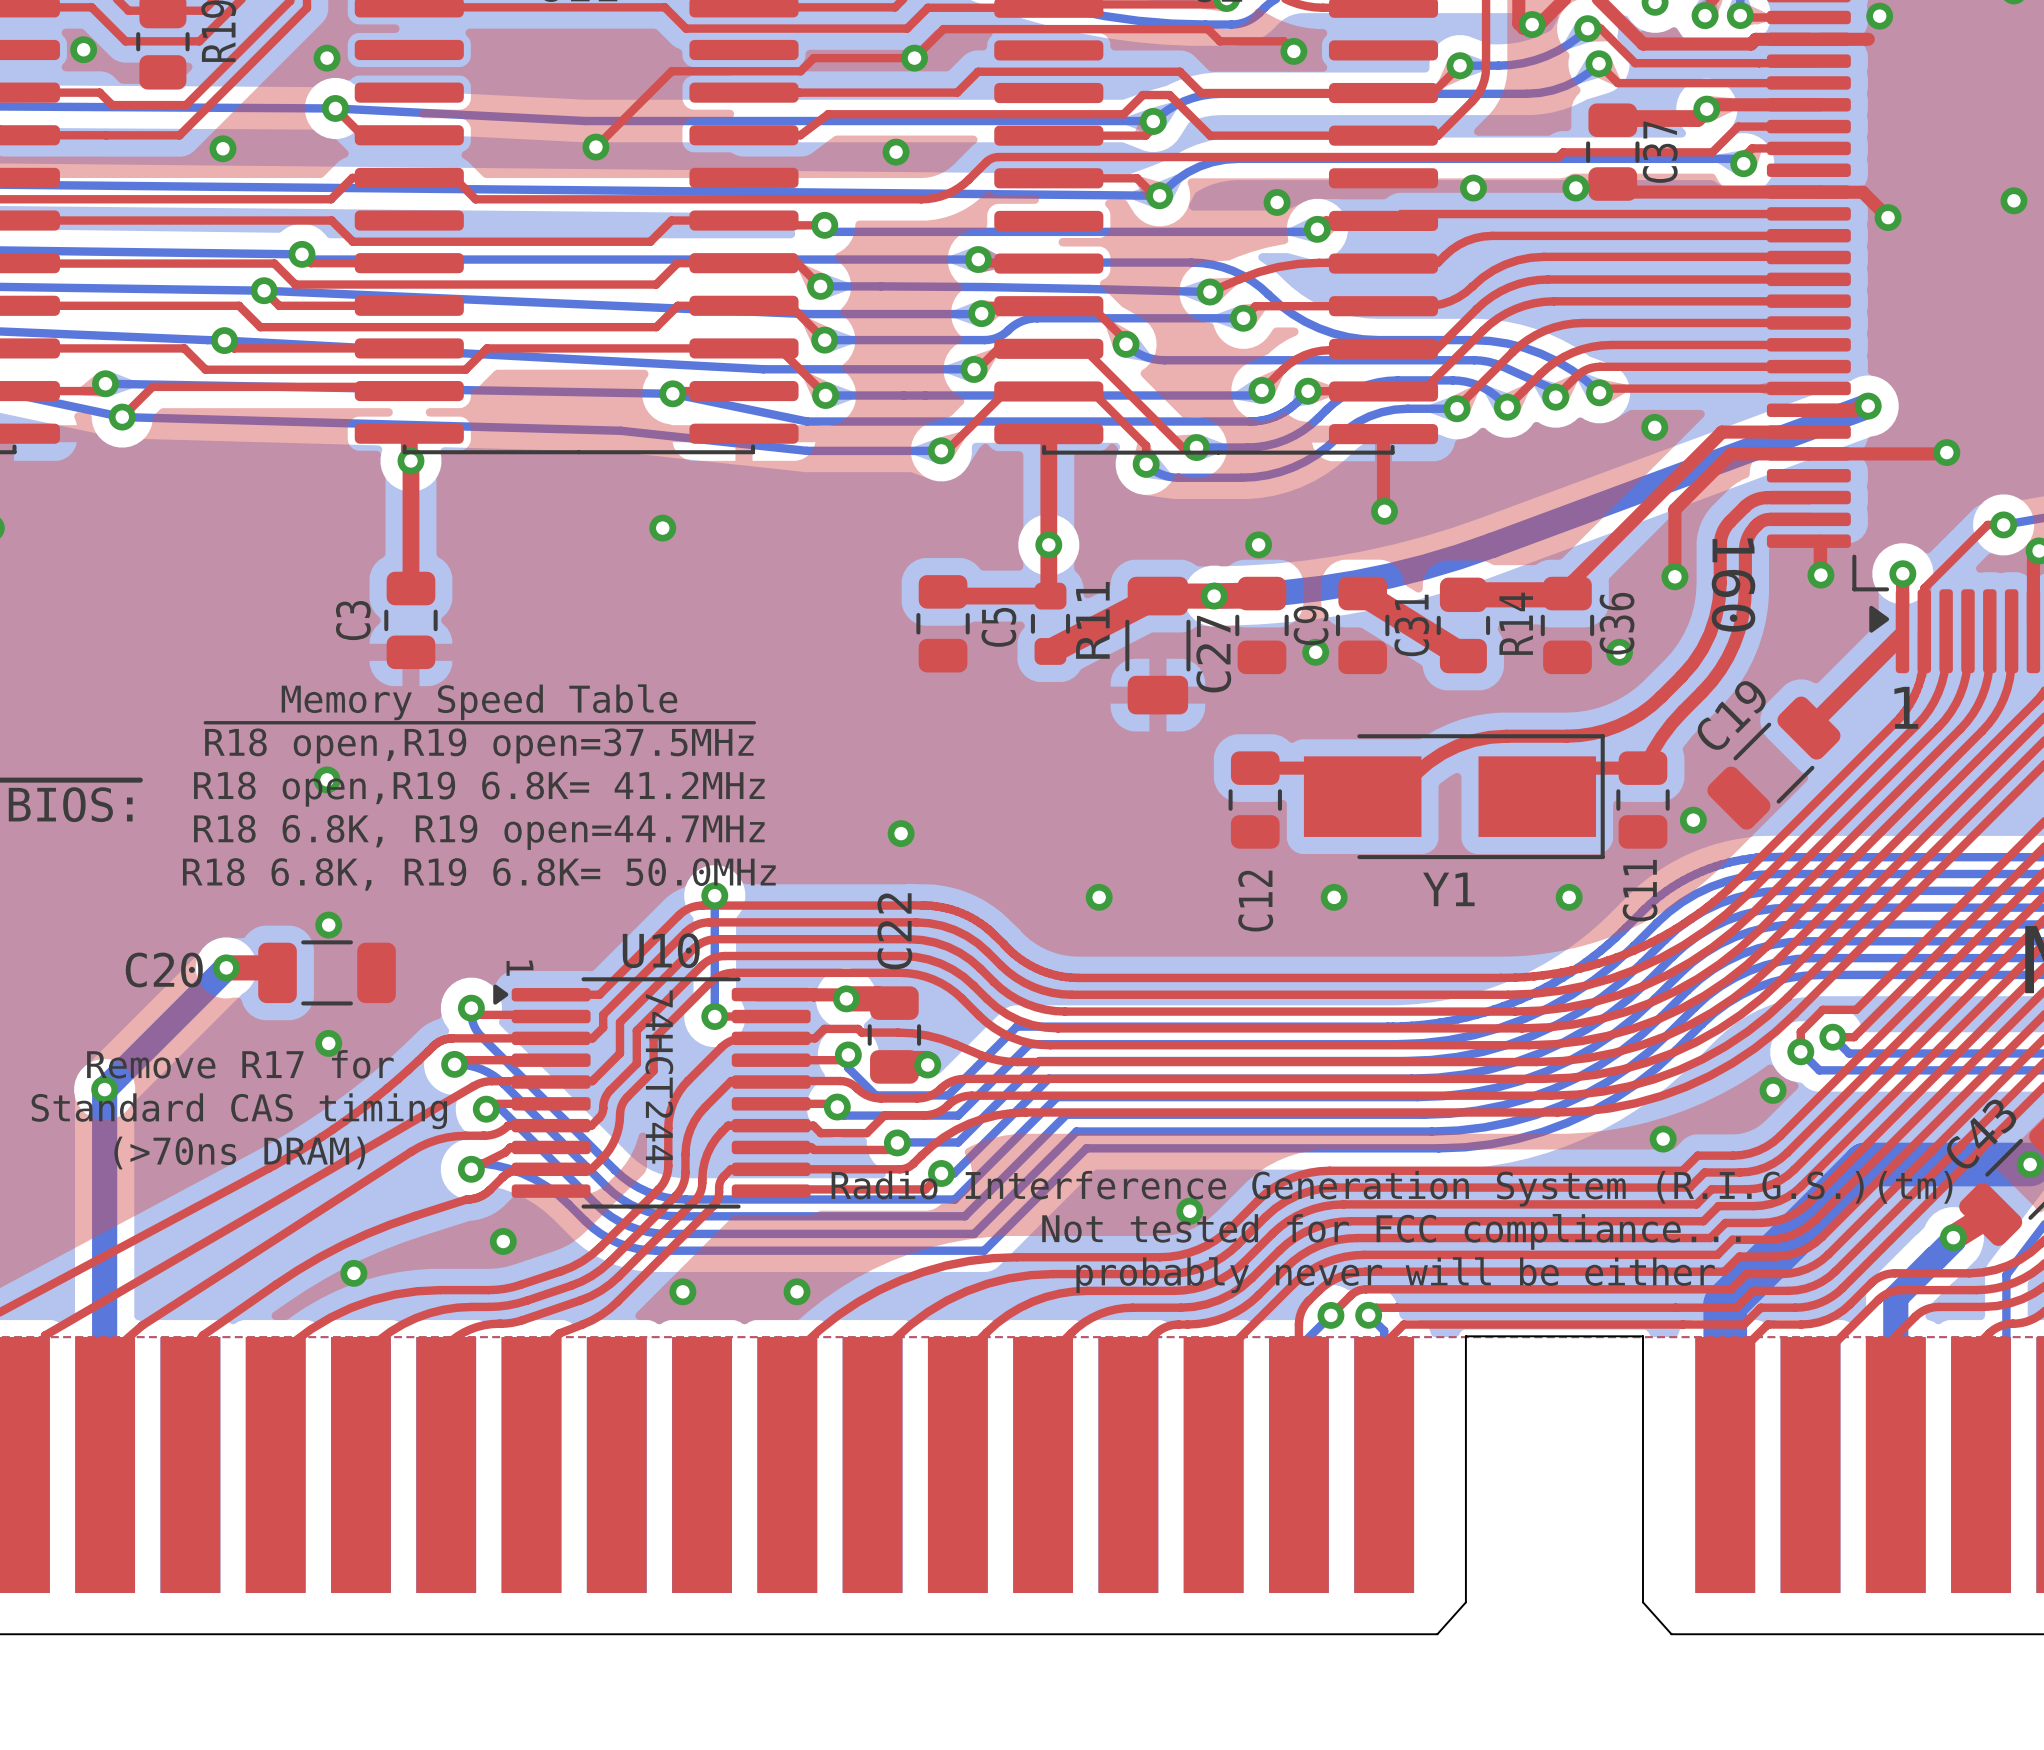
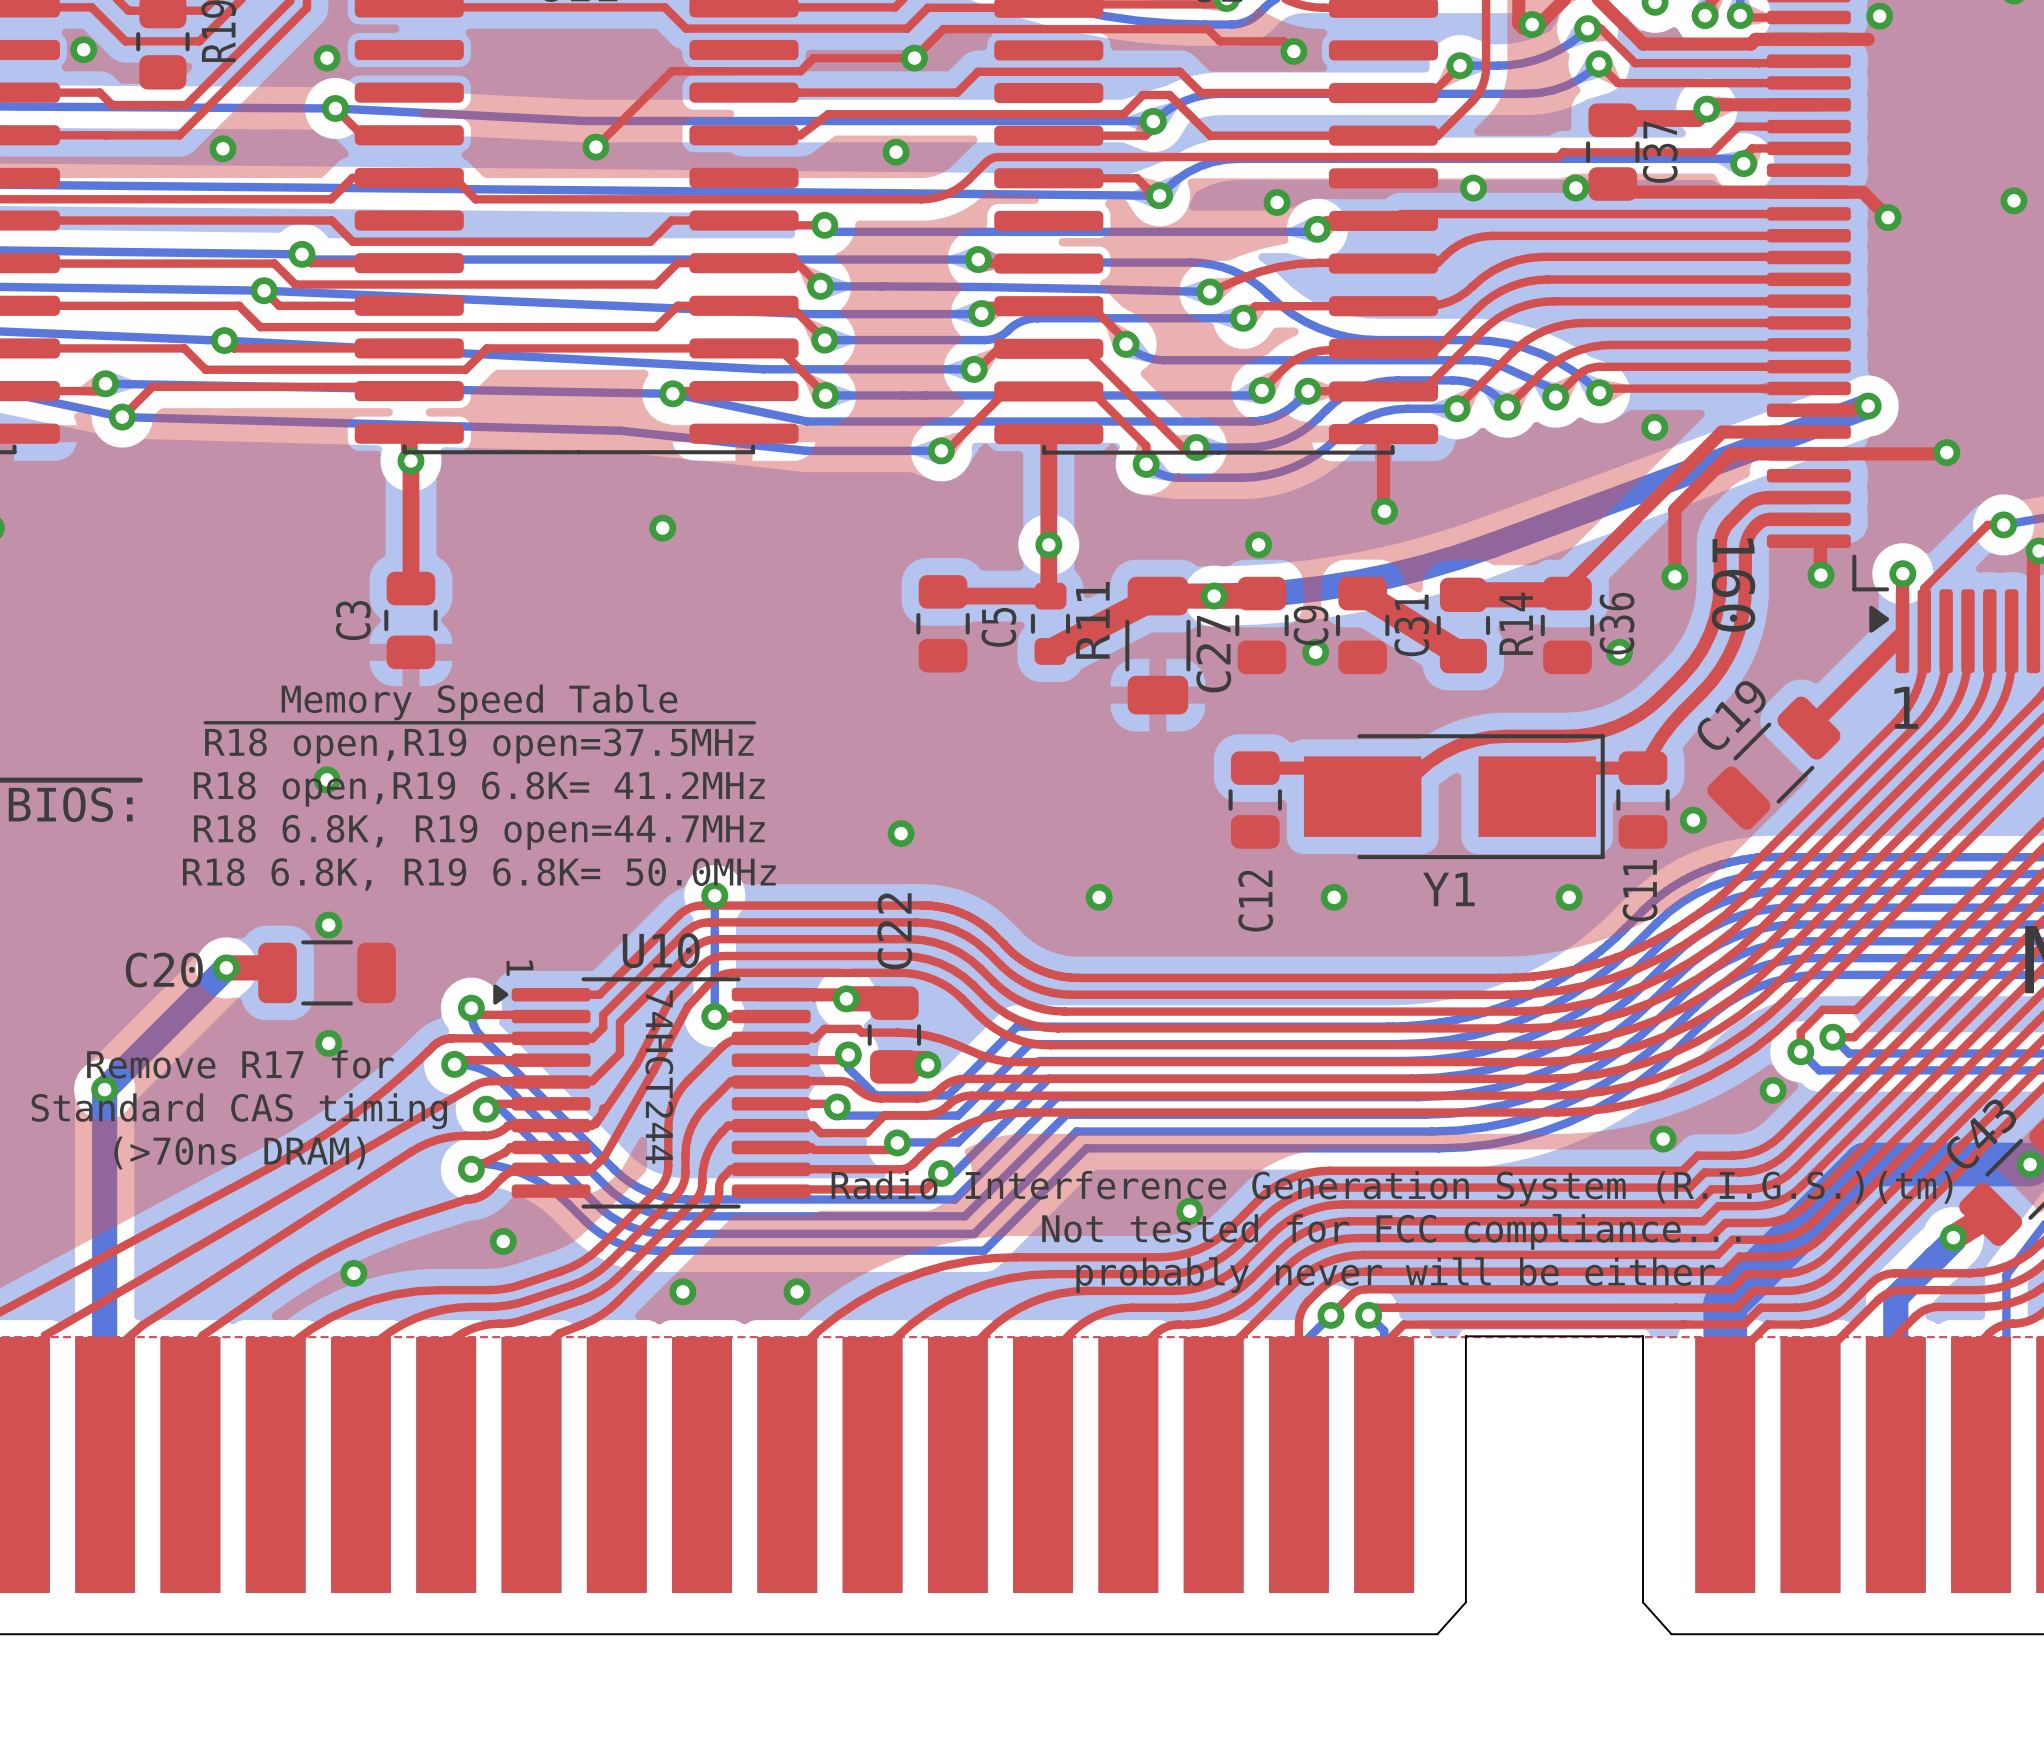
top track: (701, 965) (636, 1030) (636, 1063) (608, 1091) (603, 1107) -> (701, 965) (671, 998) (636, 1063) (595, 1123) (591, 1125)
top track: (710, 982) (653, 1039) (653, 1070) (624, 1100) (620, 1109) (617, 1132) (612, 1144) (591, 1169) -> (710, 982) (687, 1006) (604, 1157) (591, 1169)

